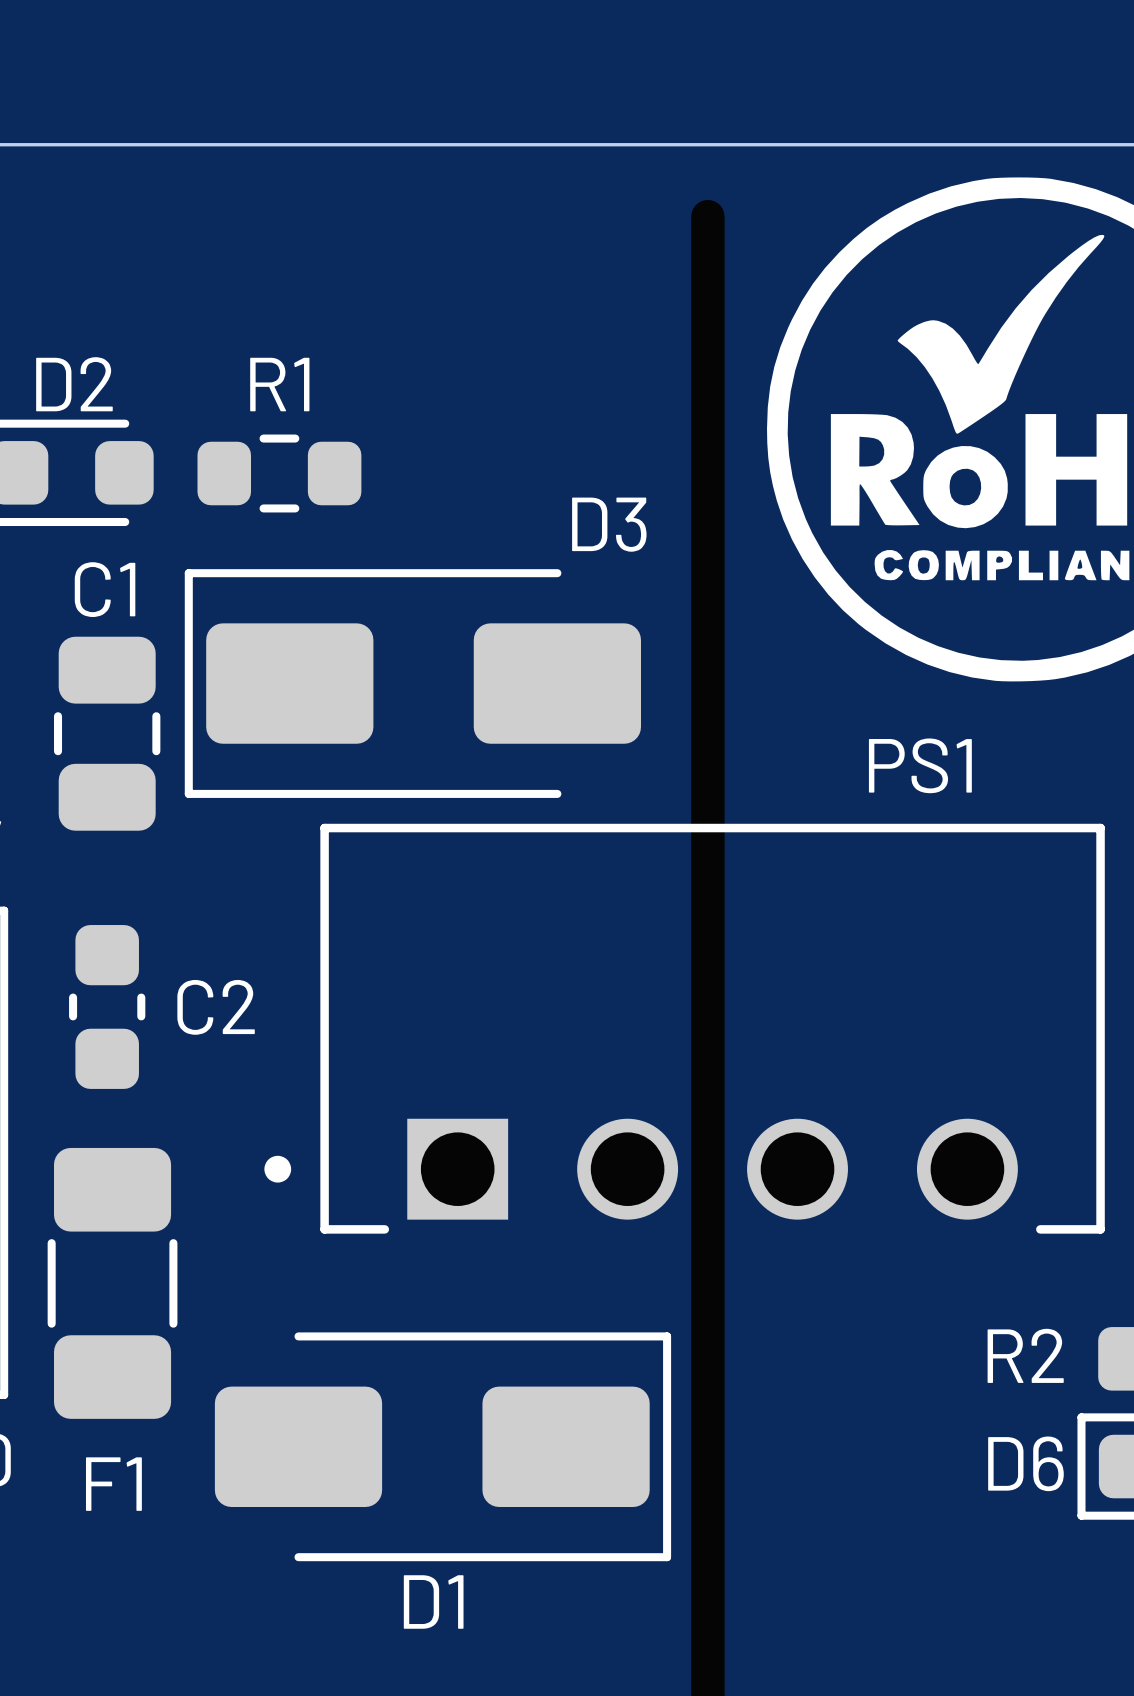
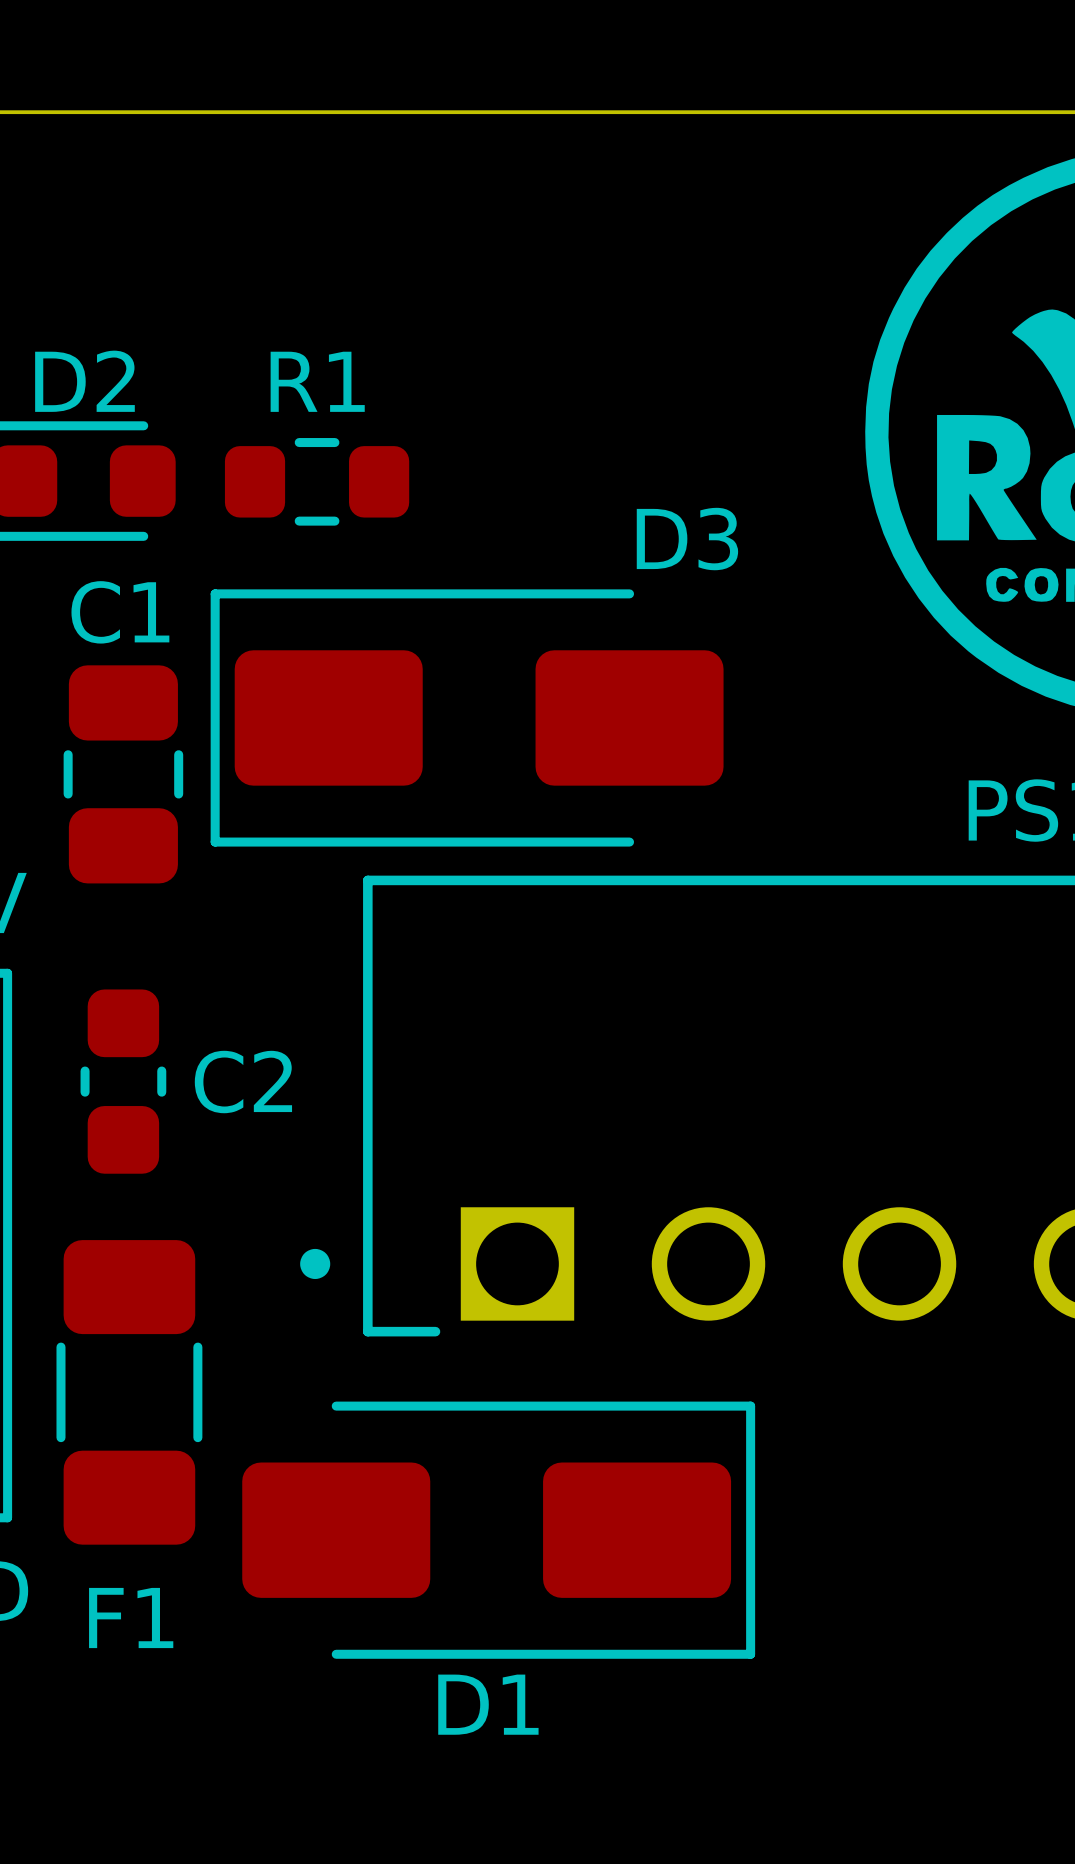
D1 position: (442, 1446) -> (498, 1530)

